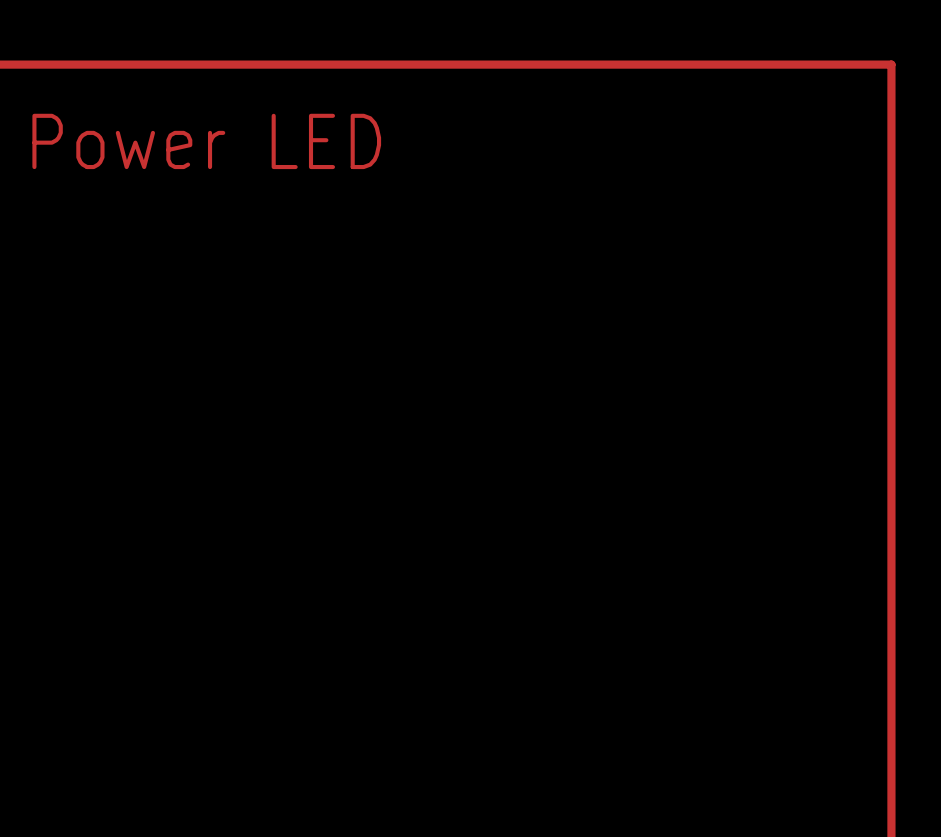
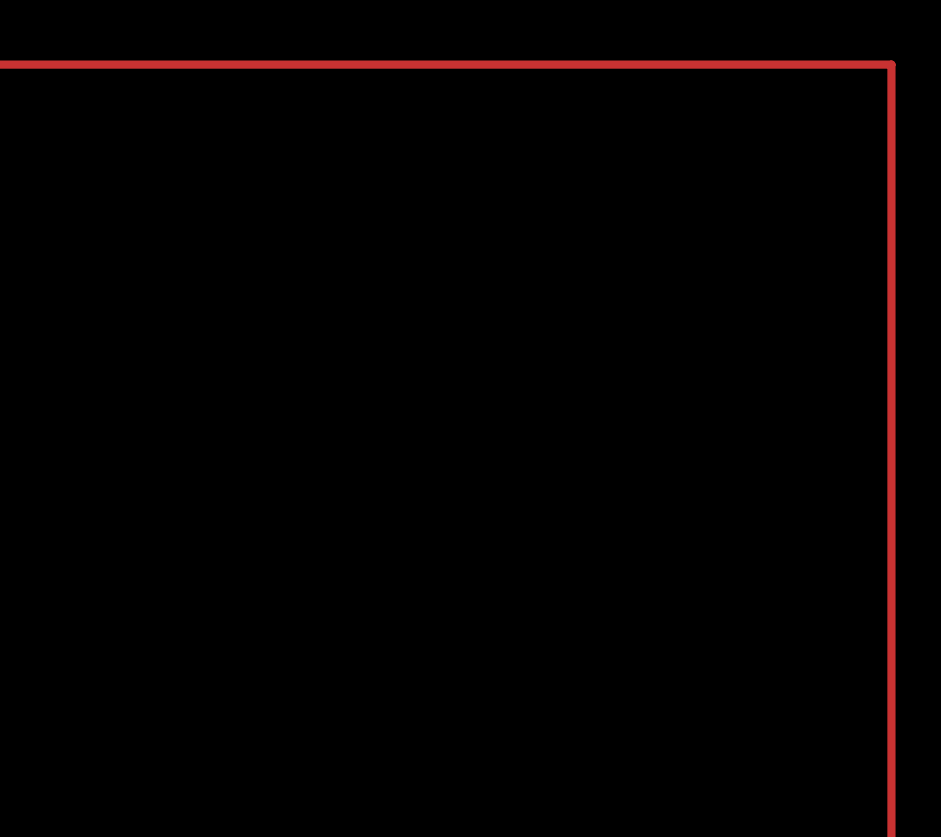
text: Power LED (206, 141) -> none

